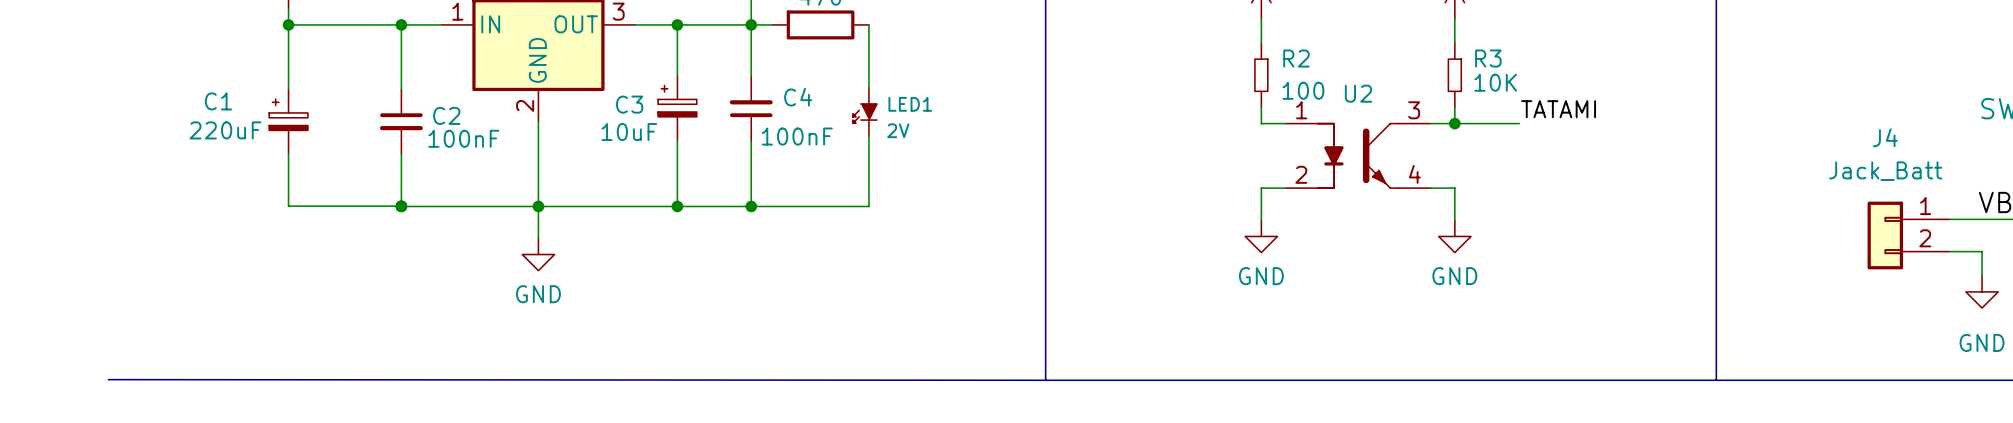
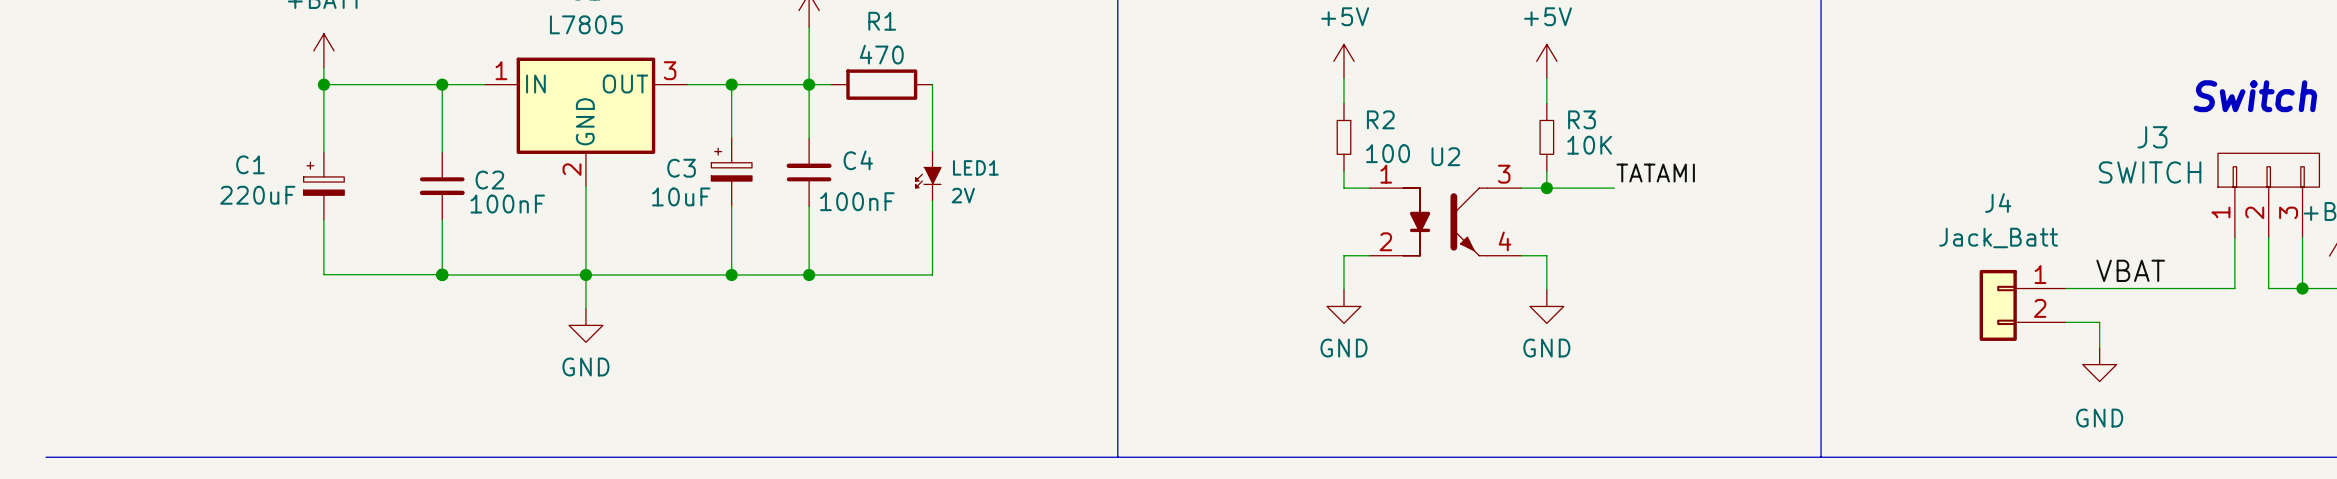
line: (108, 379) (1045, 380) -> (46, 457) (1117, 457)

